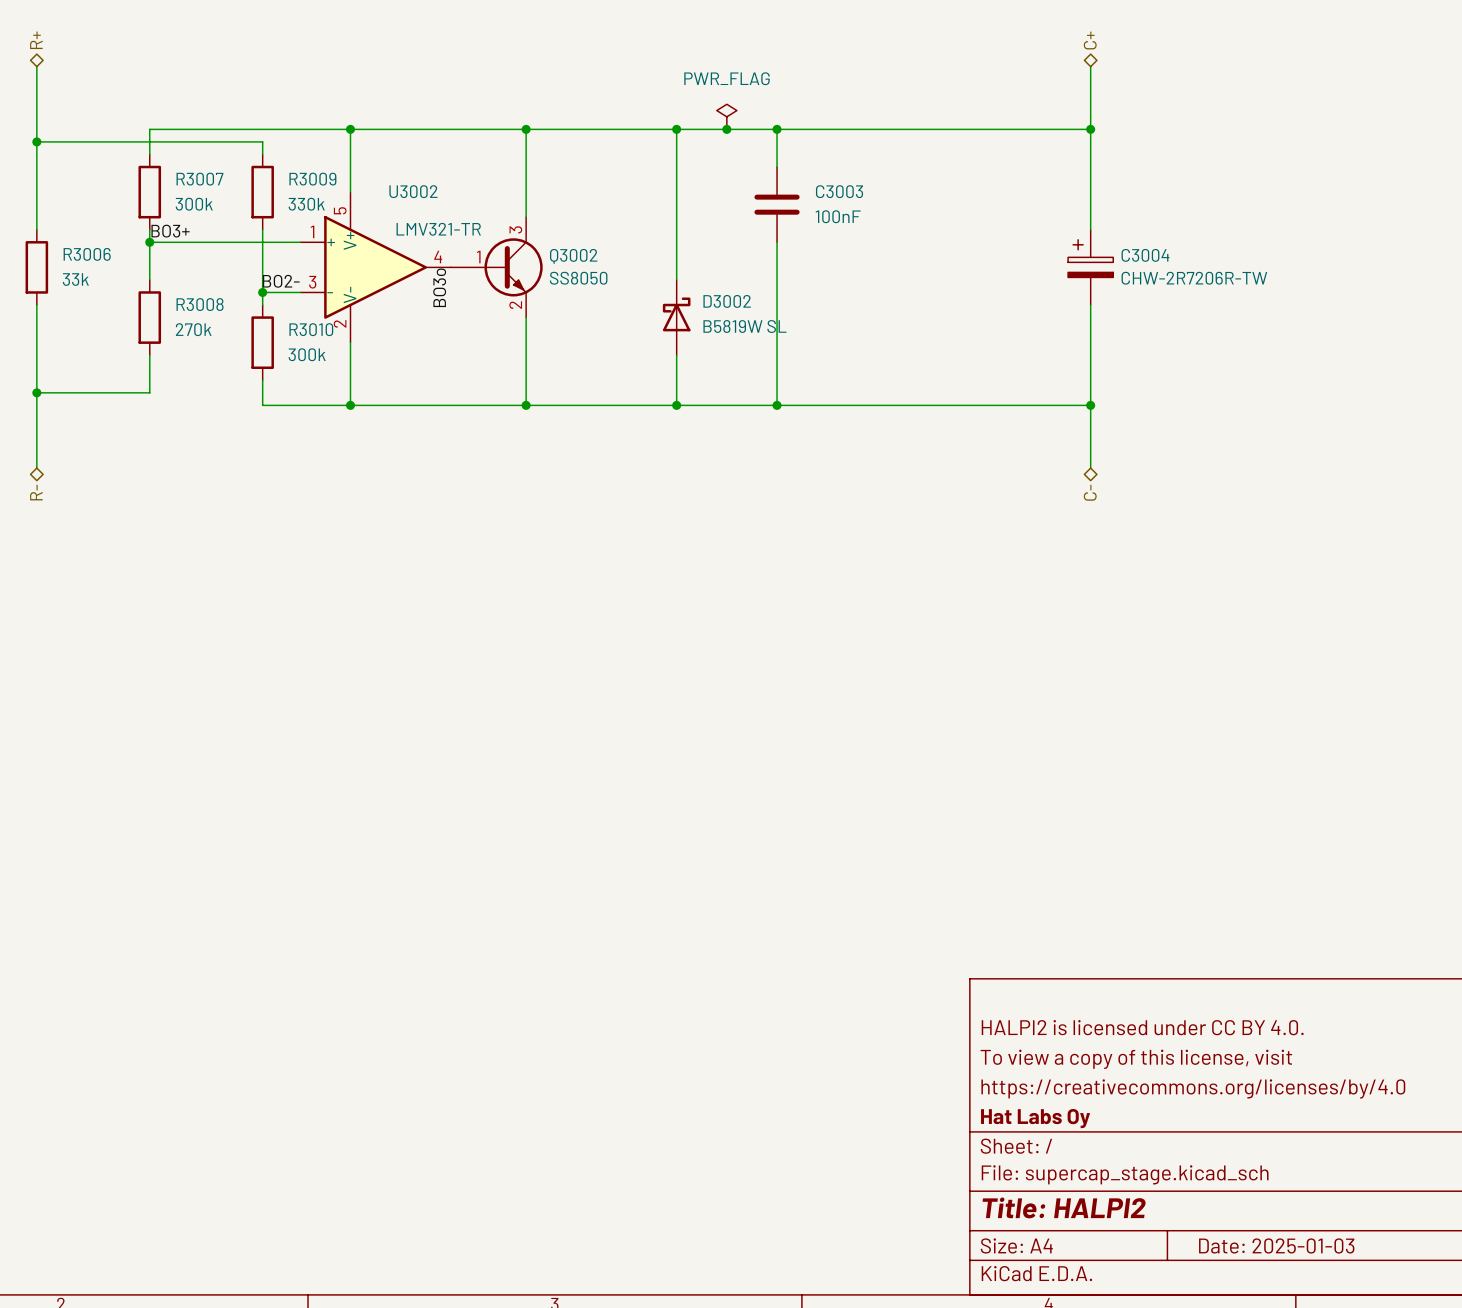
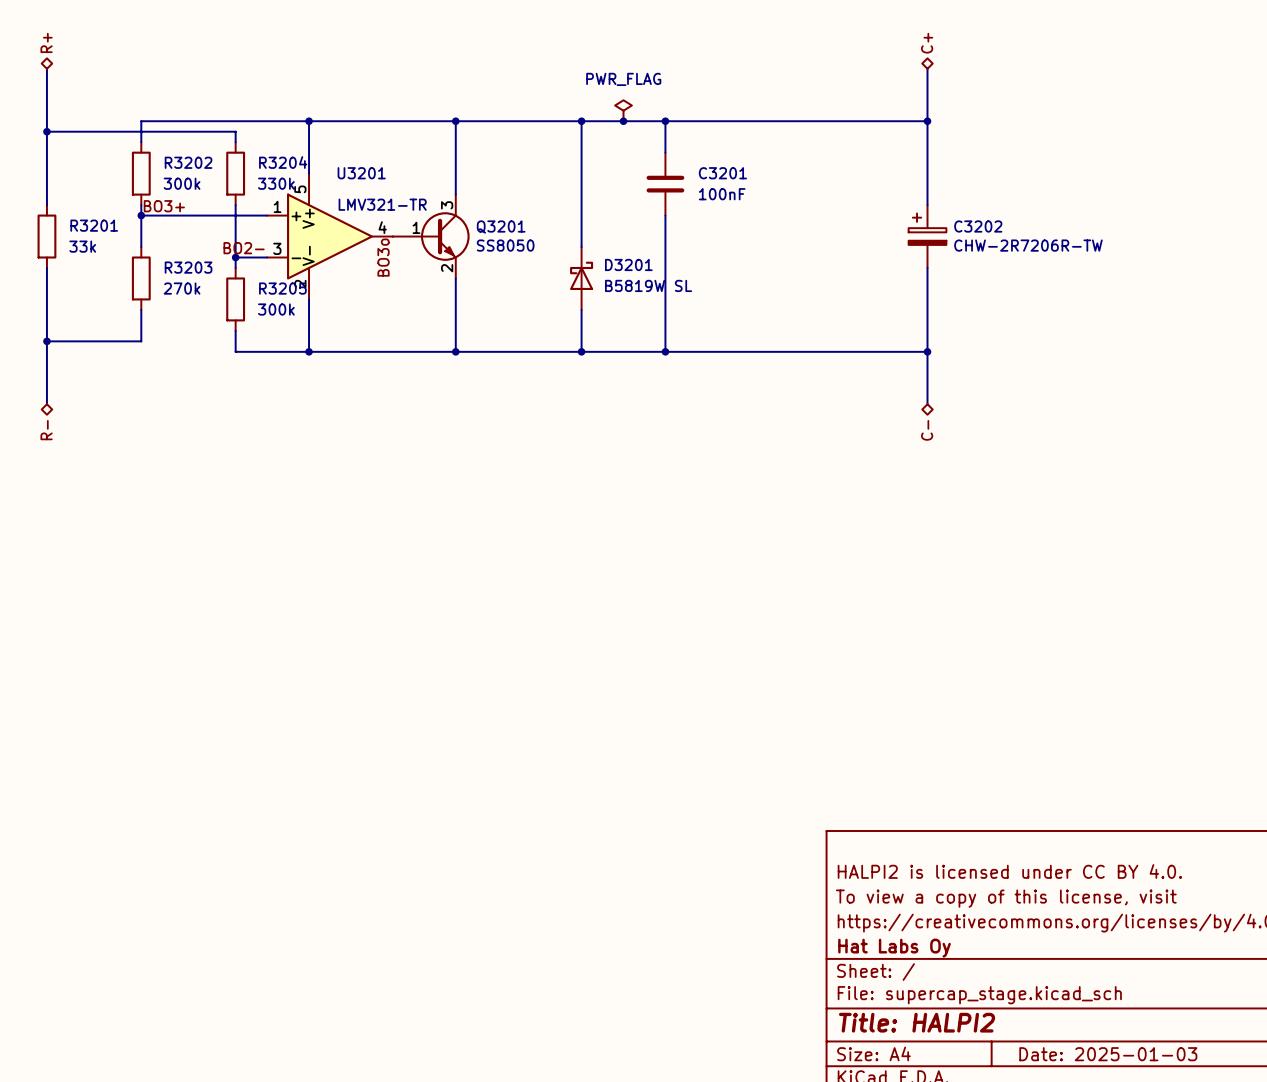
R3007 name: R3007 (199, 179) -> R3202 (188, 162)
R3009 name: R3009 (312, 179) -> R3204 (283, 162)
U3002 name: U3002 (413, 191) -> U3201 (361, 173)
C3003 name: C3003 (839, 191) -> C3201 (722, 173)
R3006 name: R3006 (87, 254) -> R3201 (94, 225)
C3004 name: C3004 (1145, 255) -> C3202 (978, 226)
Q3002 name: Q3002 (573, 256) -> Q3201 (501, 227)
D3002 name: D3002 (727, 301) -> D3201 (628, 264)
R3008 name: R3008 (200, 304) -> R3203 (188, 267)
R3010 name: R3010 (311, 329) -> R3205 (282, 288)

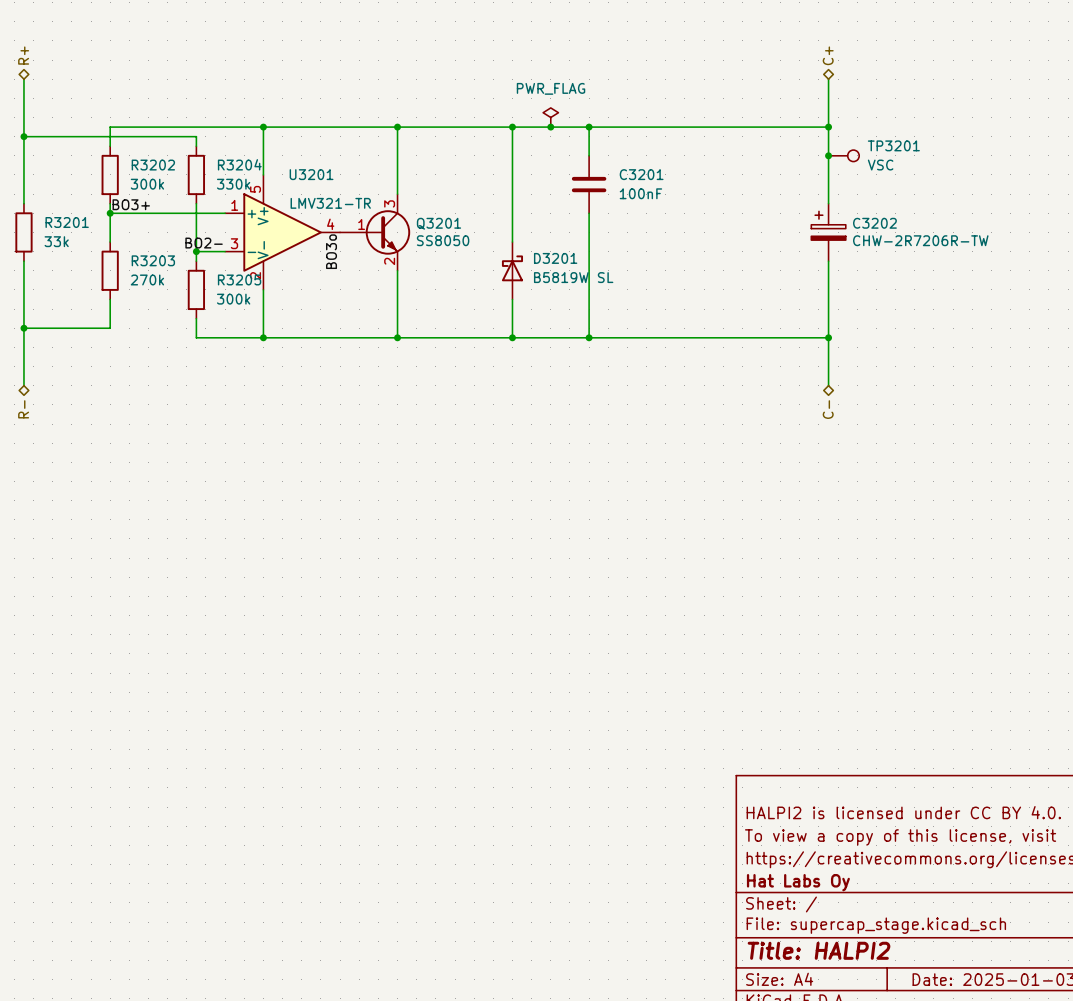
junction: none -> (828, 155)
TP3201: none -> VSC (843, 155)

